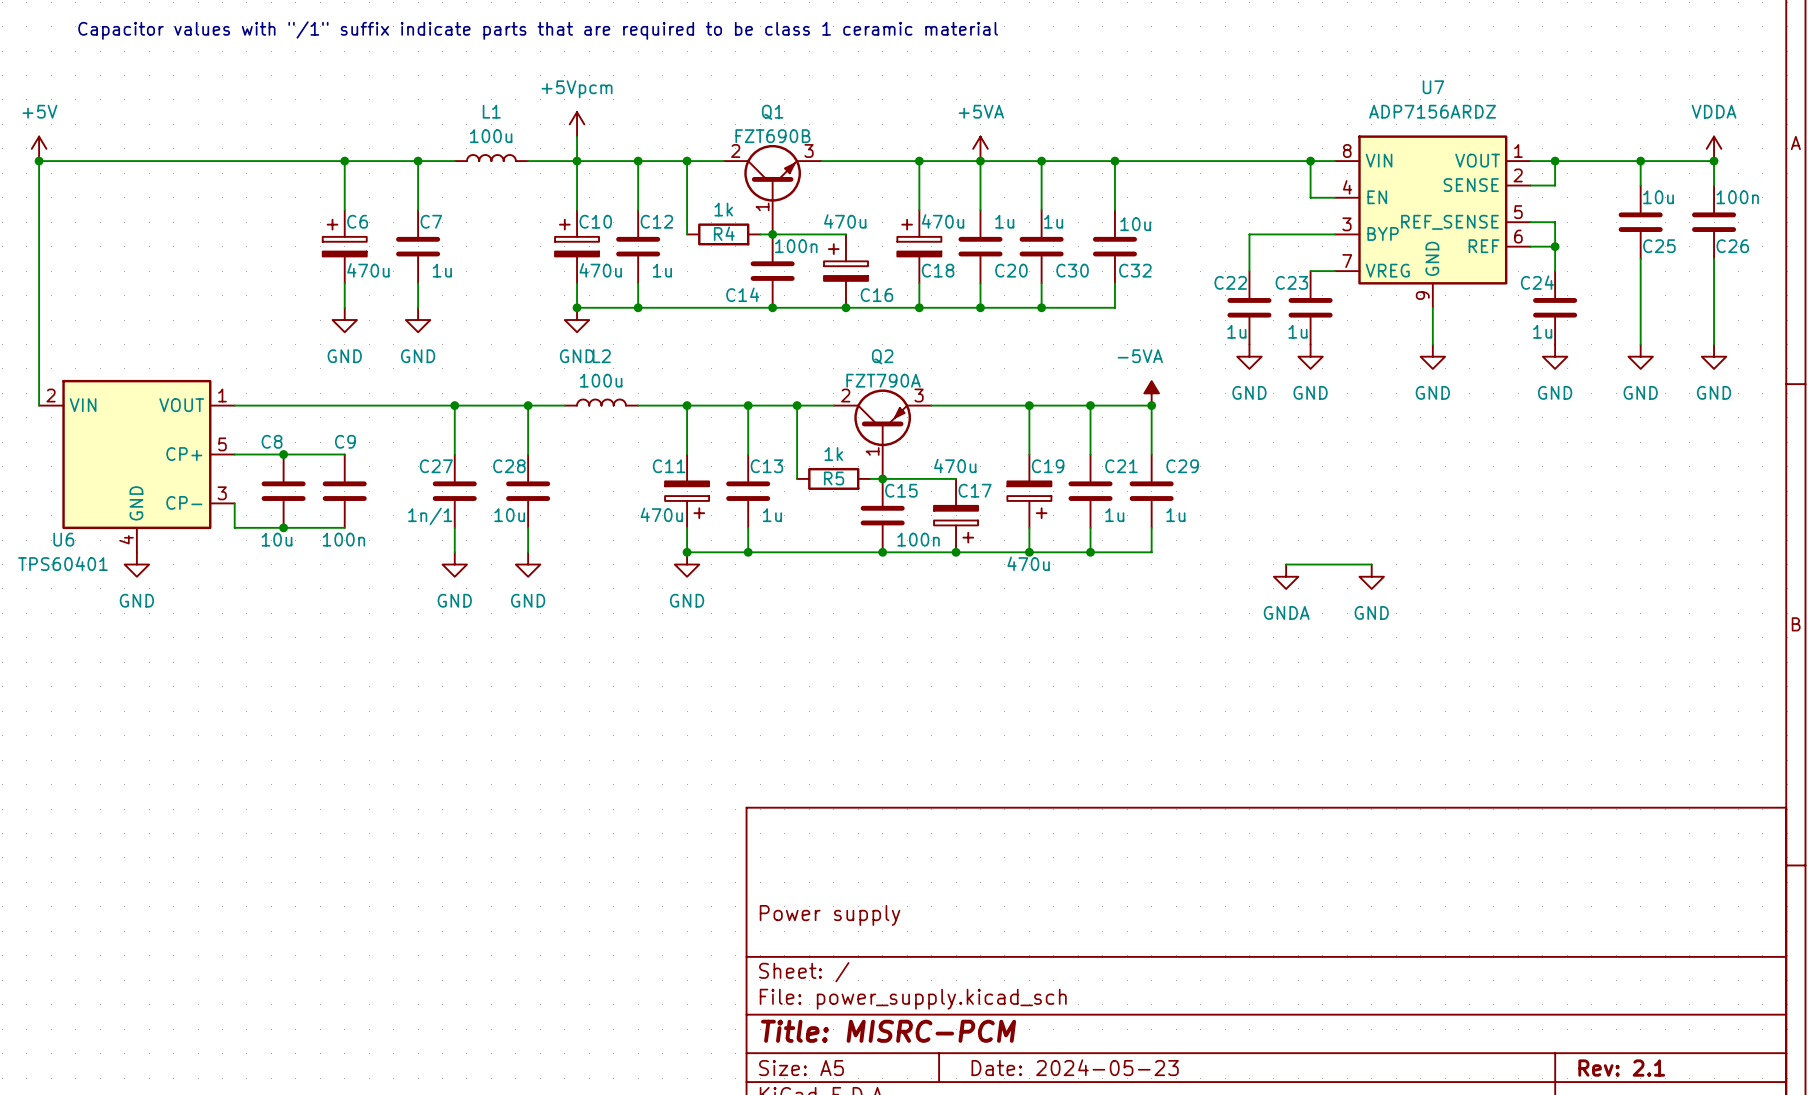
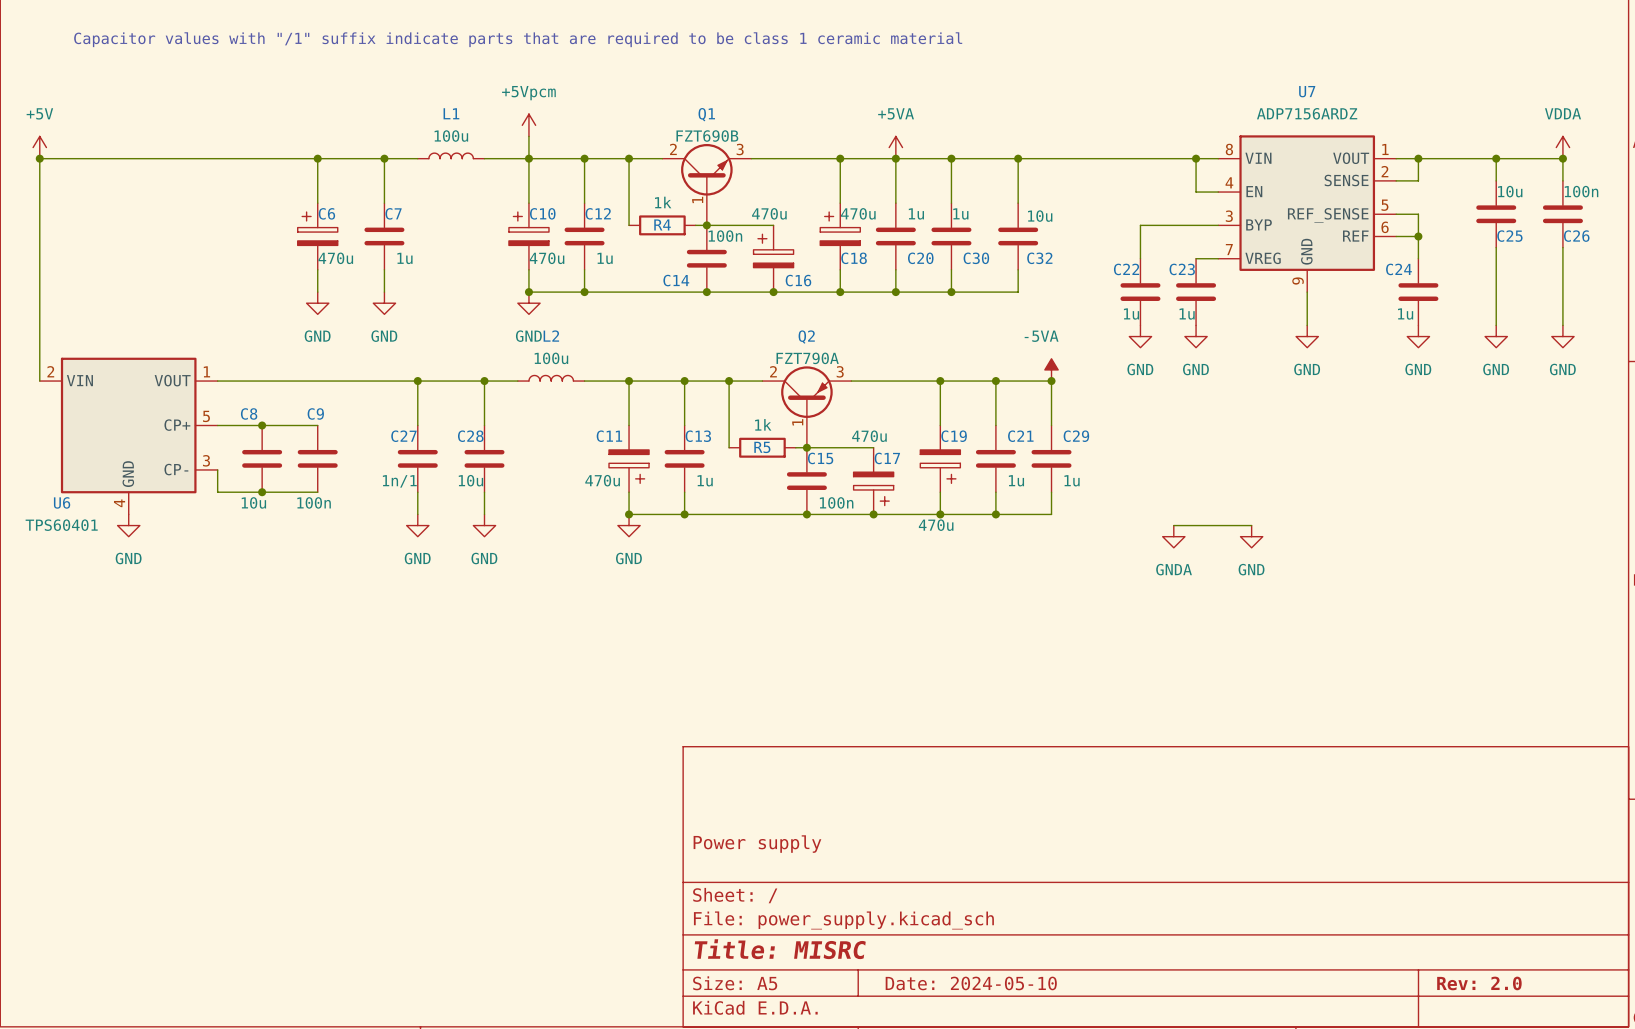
title block: Title: MISRC-PCM (888, 1031) -> Title: MISRC (780, 949)
title block: Date: 2024-05-23 (1075, 1067) -> Date: 2024-05-10 (971, 983)
title block: Rev: 2.1 (1621, 1068) -> Rev: 2.0 (1479, 983)

